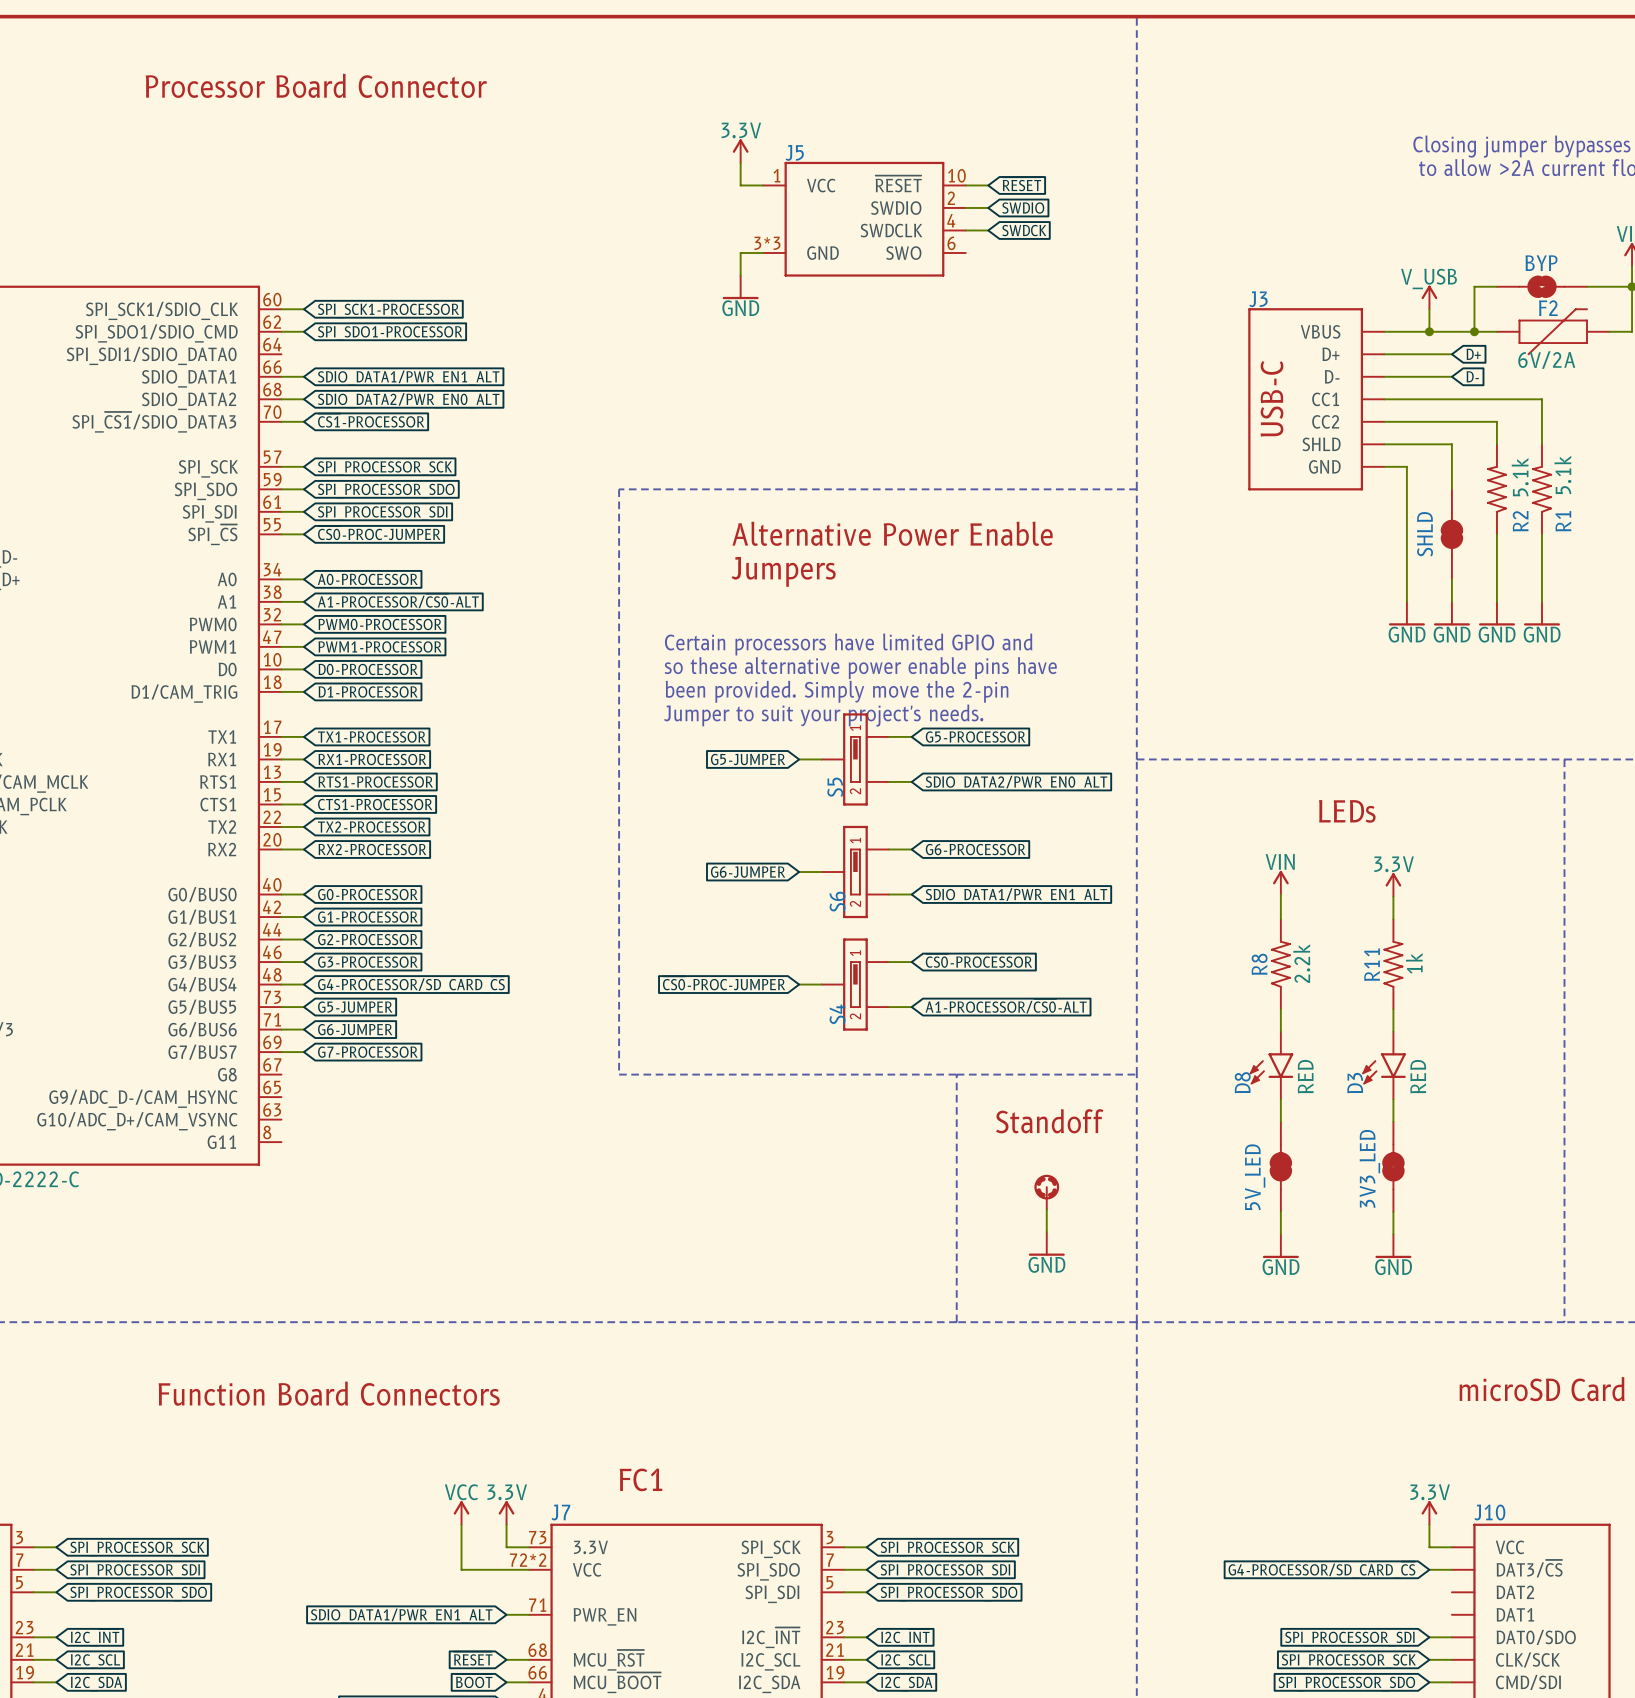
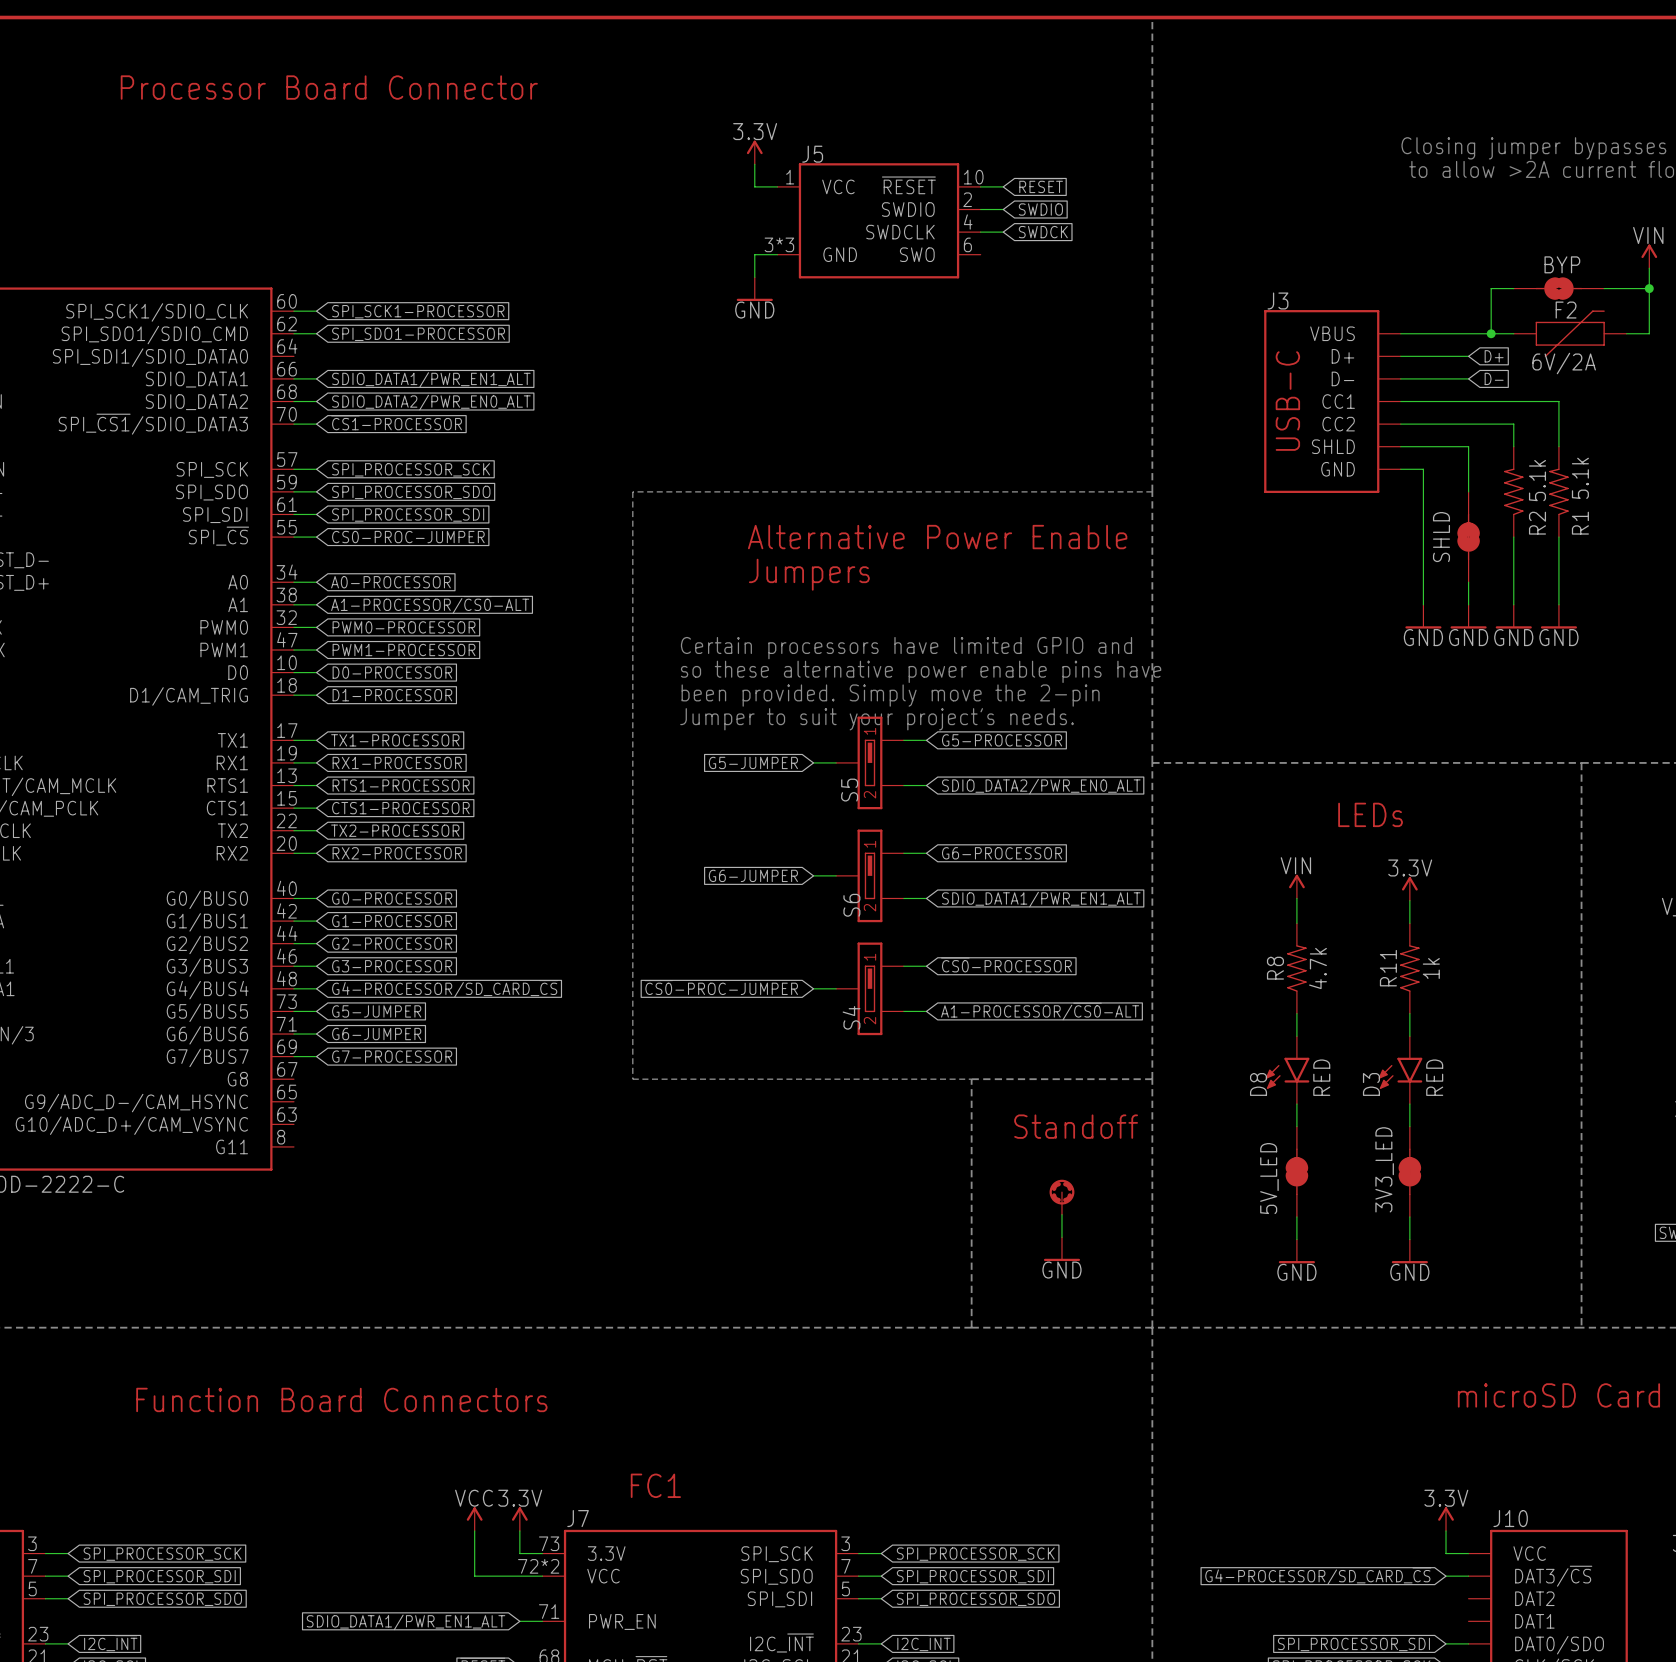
power symbol: V_USB (1429, 297) -> none
wire: (1429, 309) (1429, 331) -> none
junction: (1429, 331) -> none
R8 value: 2.2k (1301, 963) -> 4.7k (1318, 968)

